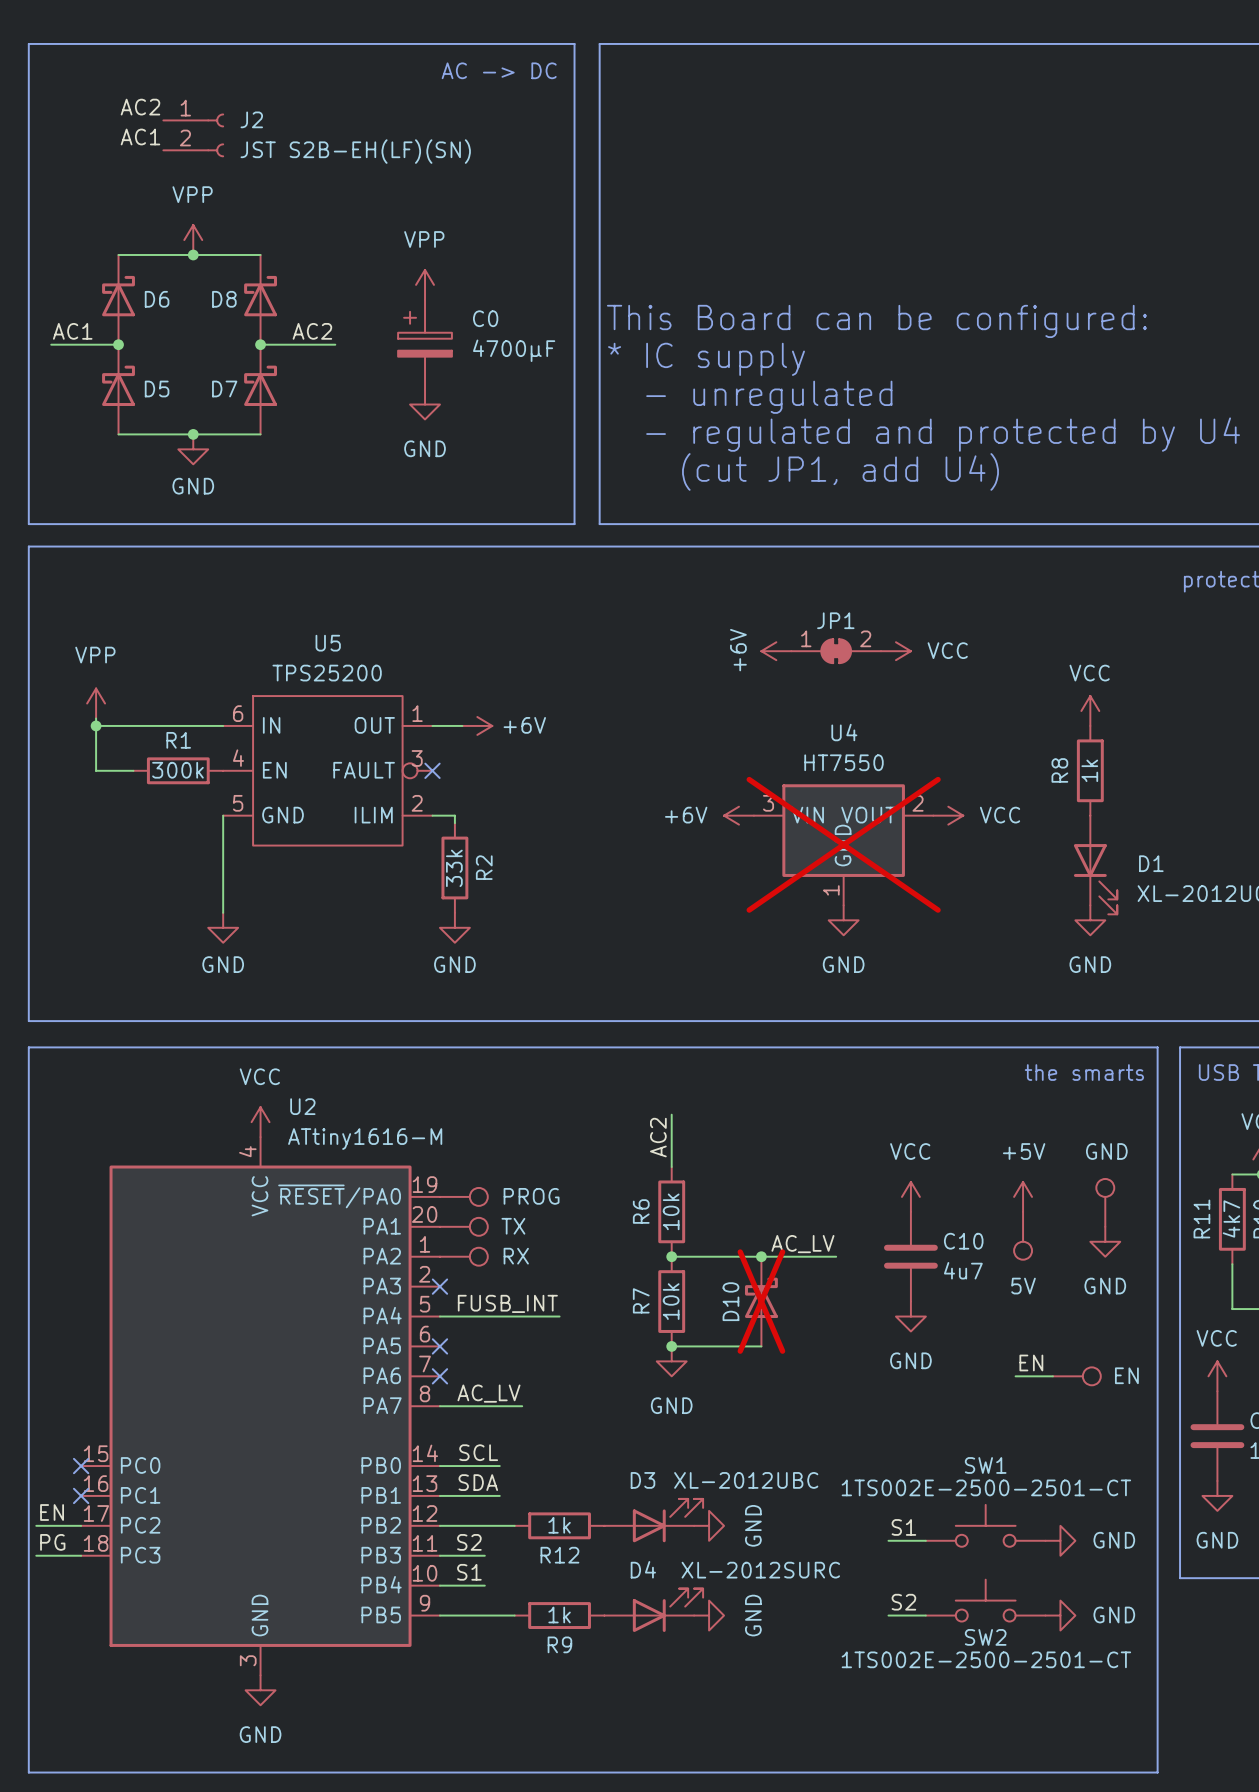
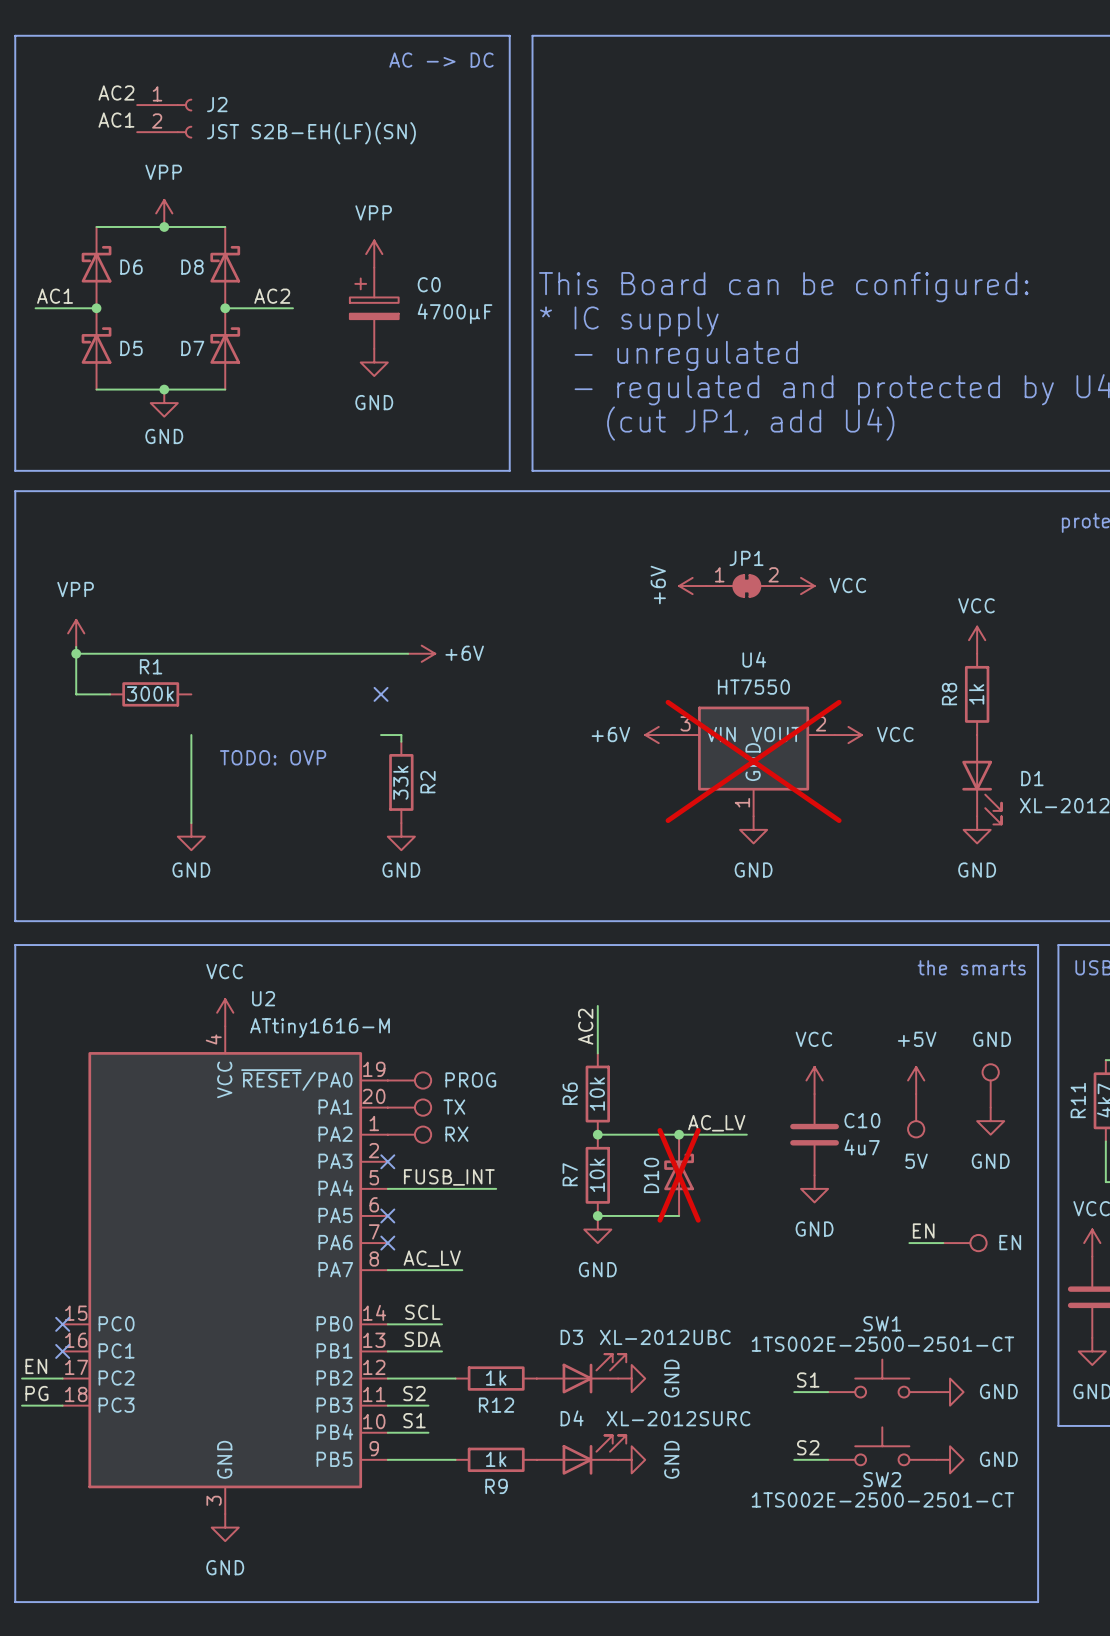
wire: none -> (191, 653) (381, 653)
U5: TPS25200 (327, 770) -> none
text: none -> TODO: OVP (273, 757)

